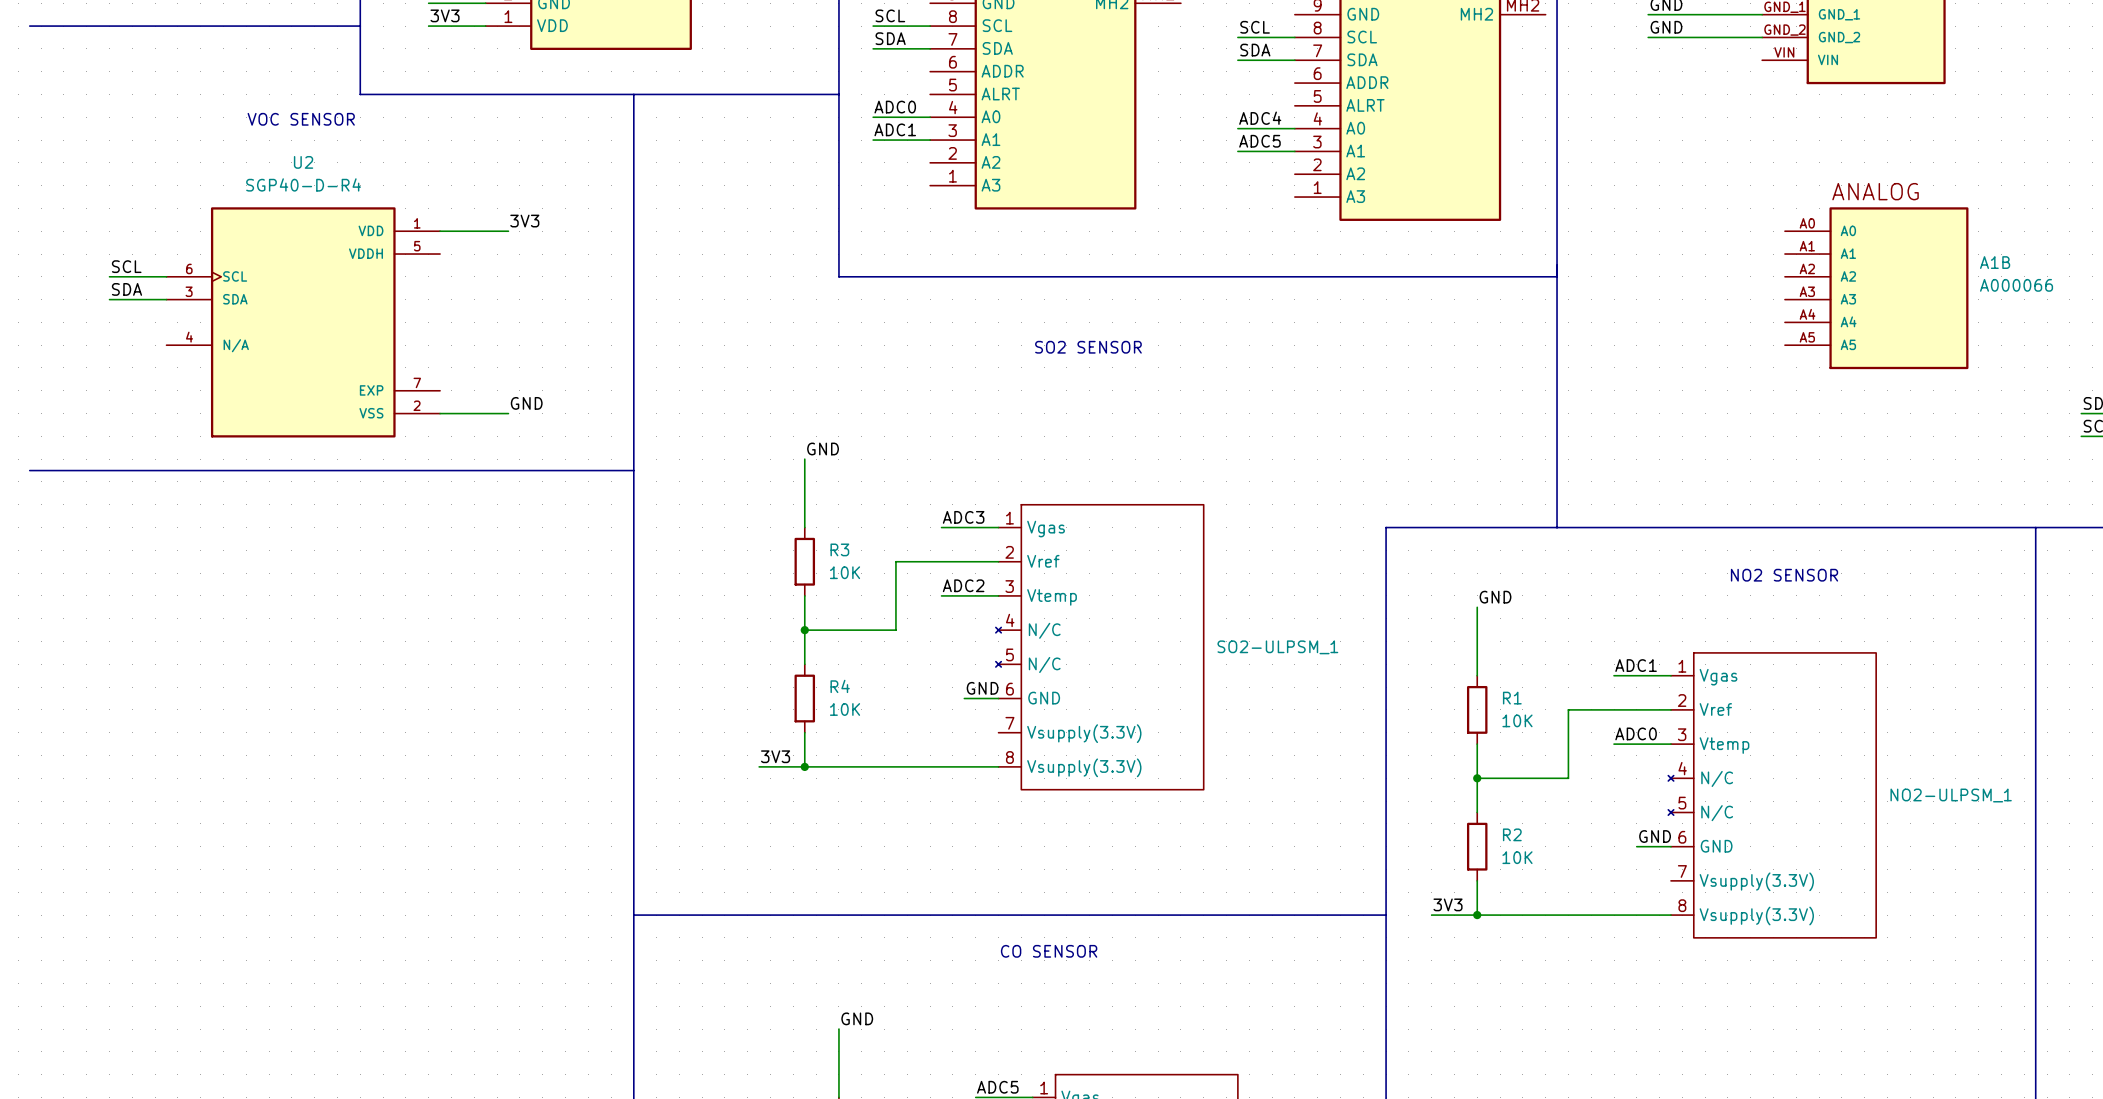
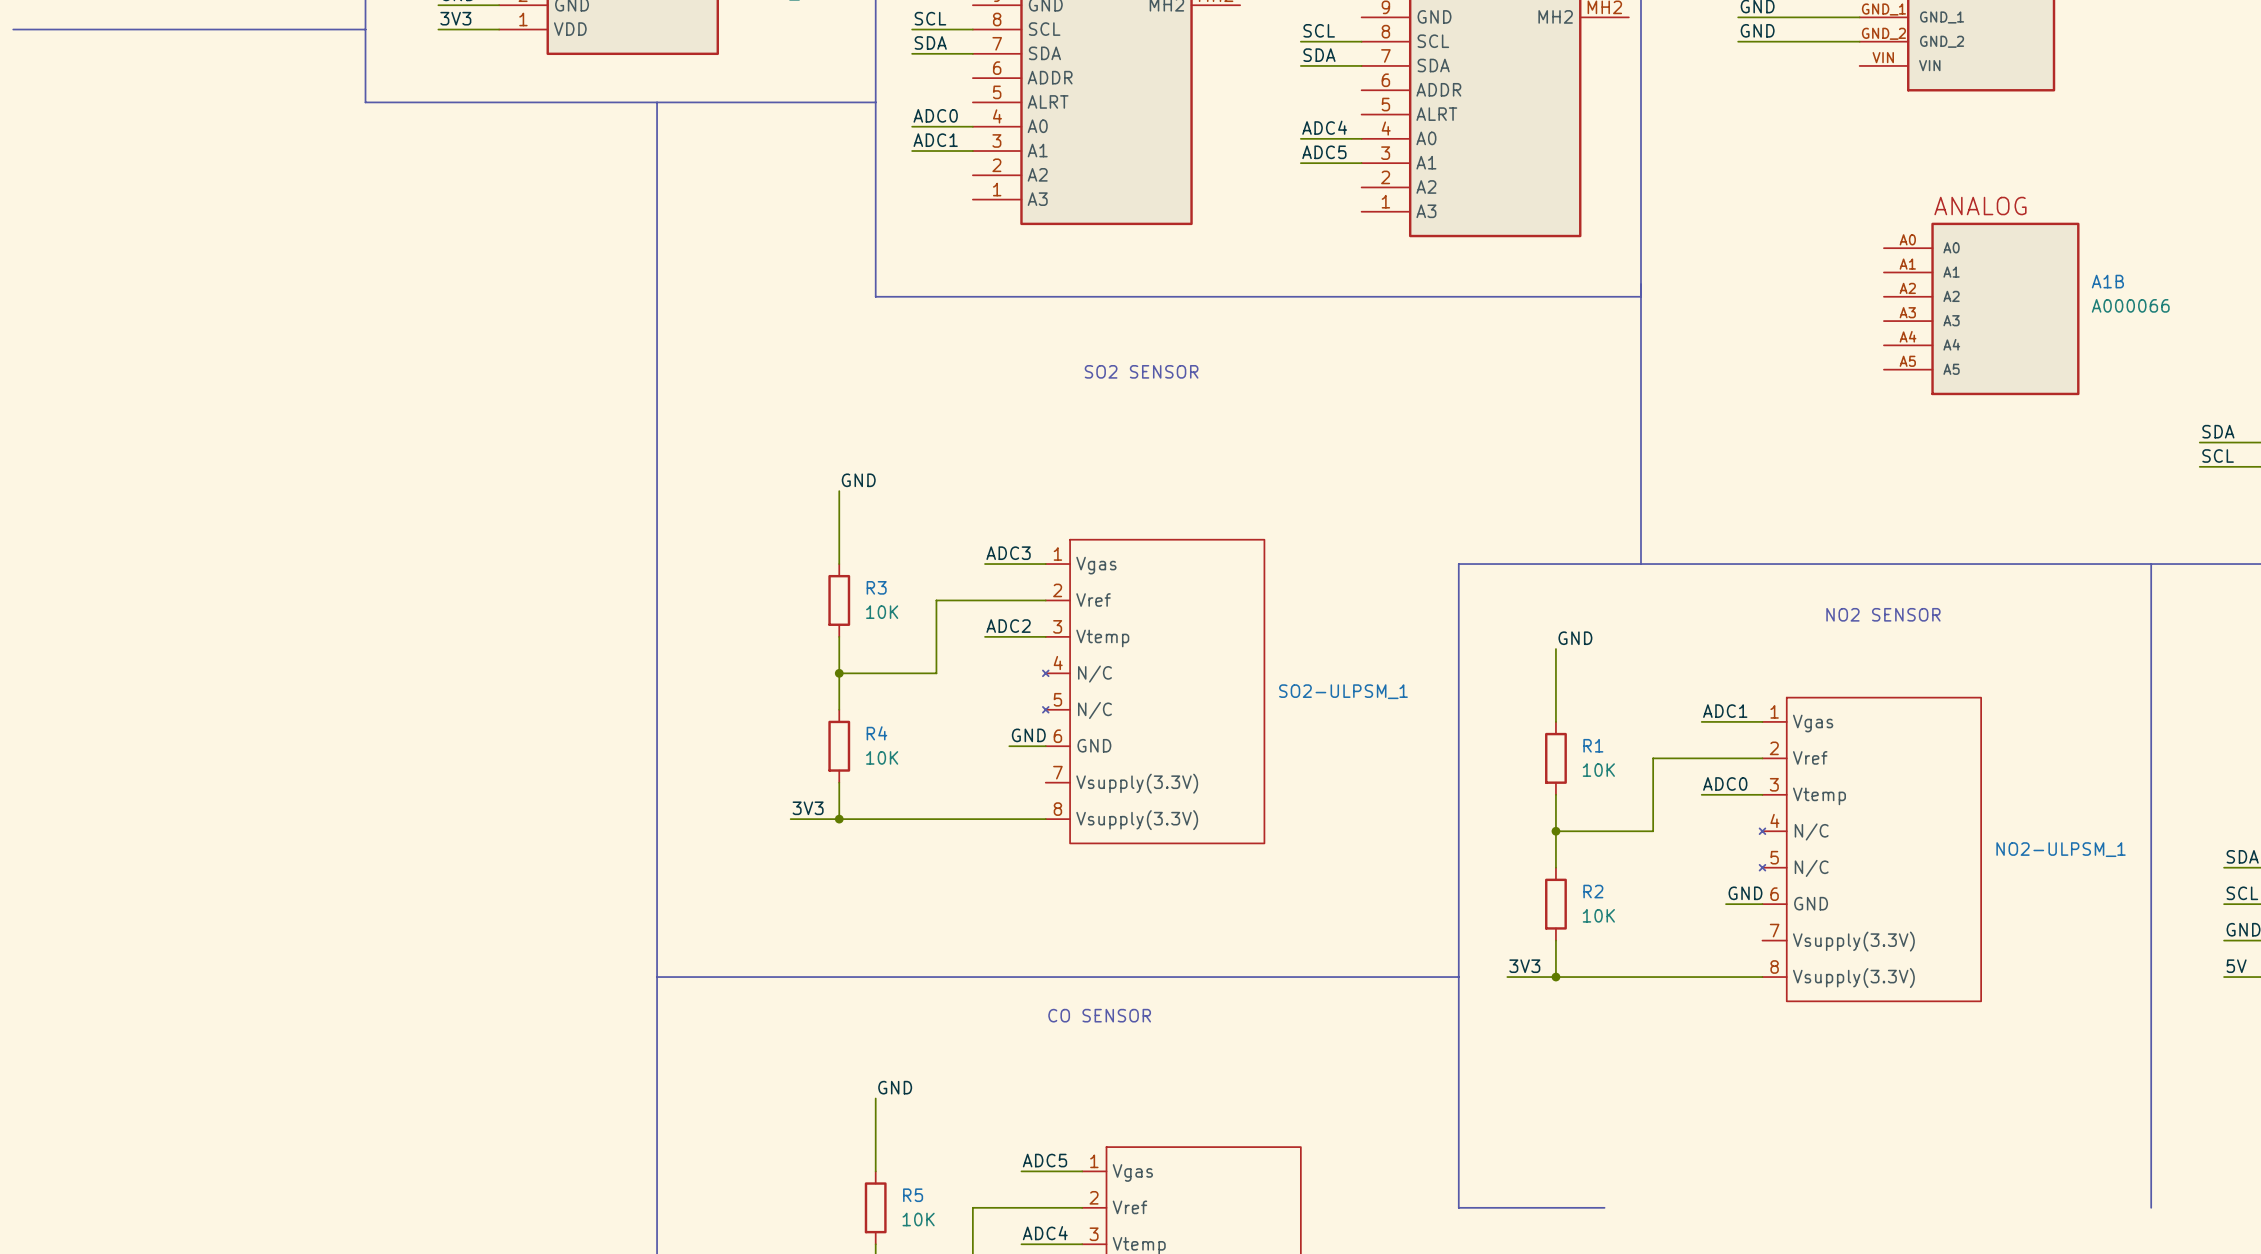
text: VOC SENSOR (301, 119) -> none
label: 3V3 (524, 221) -> none
wire: (440, 231) (508, 231) -> none
label: SCL (126, 266) -> none
wire: (109, 276) (166, 276) -> none
label: SDA (126, 289) -> none
wire: (109, 299) (166, 299) -> none
U2: SGP40-D-R4 (303, 322) -> none
label: GND (526, 403) -> none
wire: (440, 413) (508, 413) -> none
line: (29, 470) (633, 470) -> none

